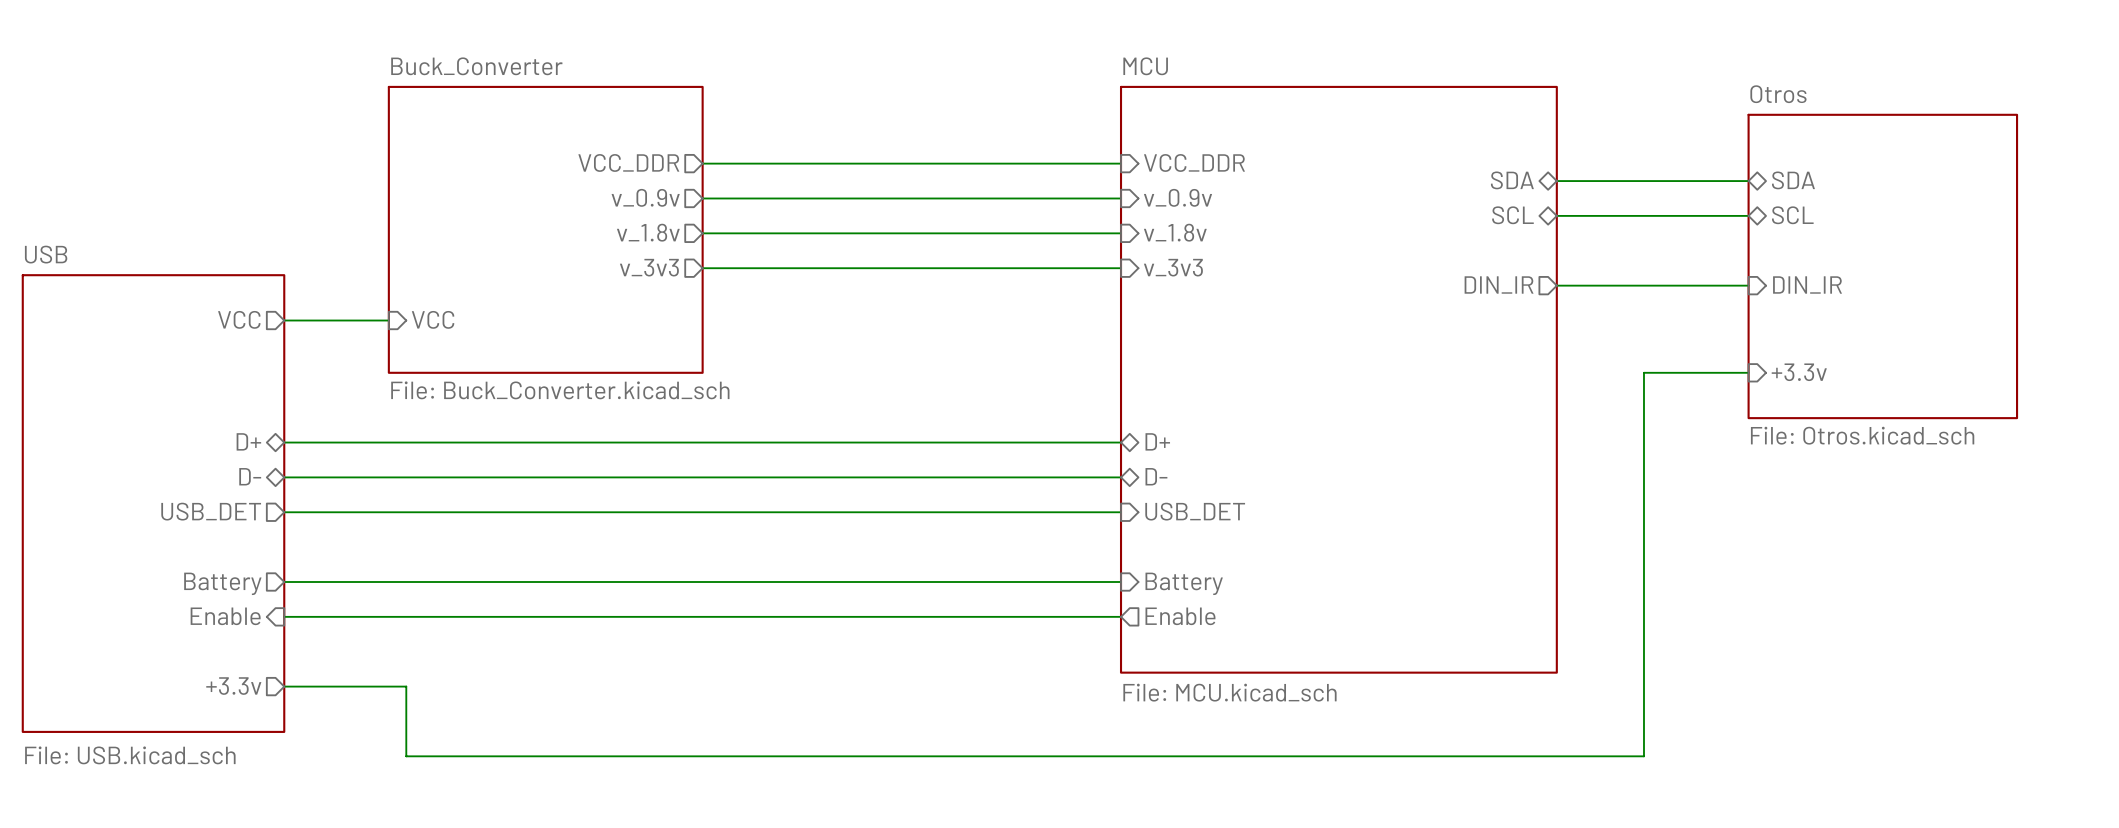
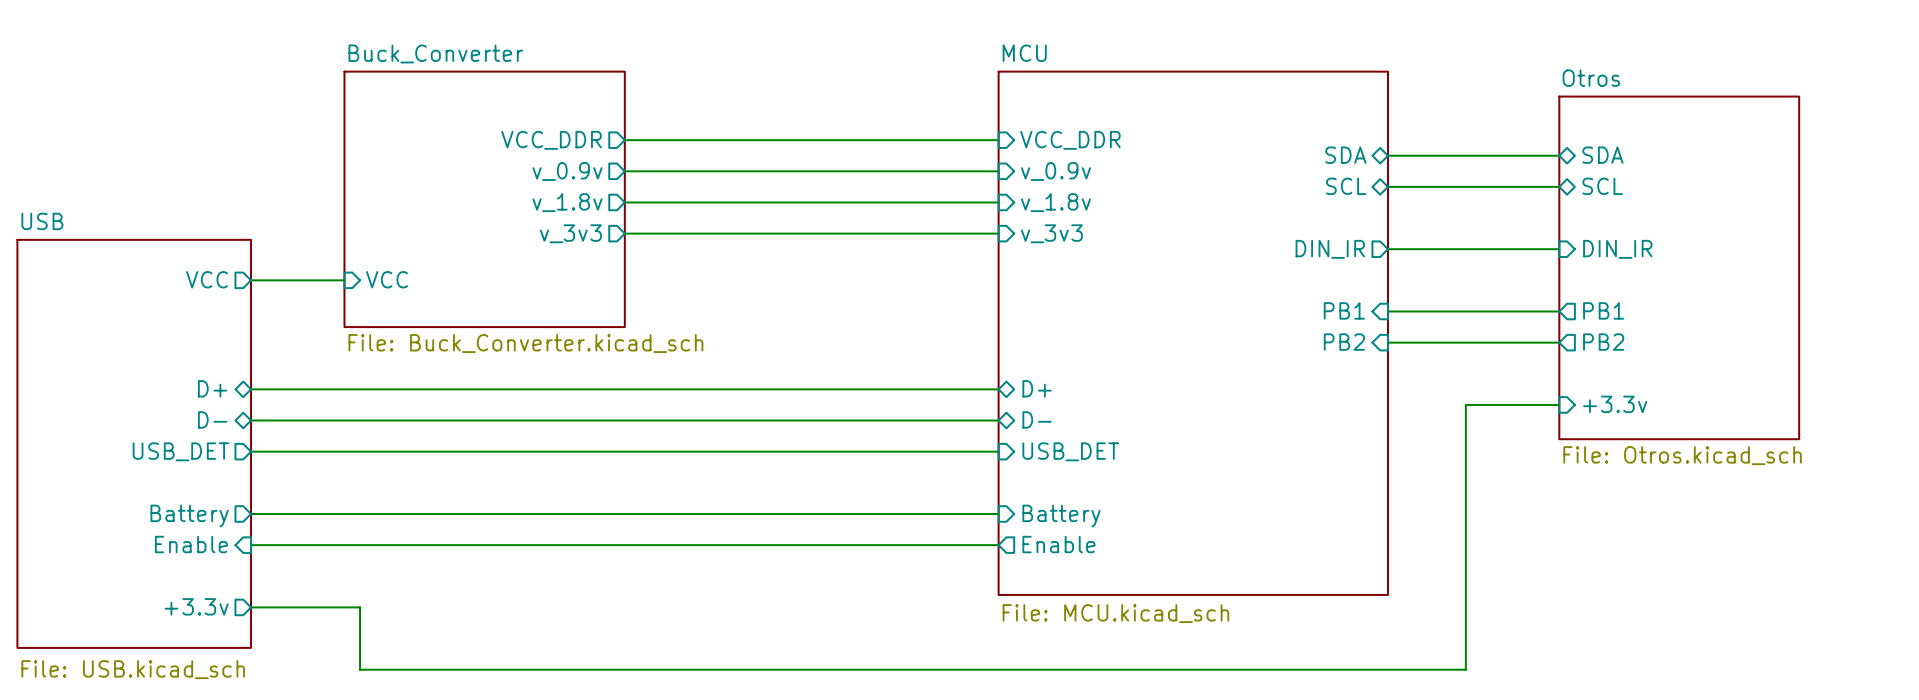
sheet Otros: File: Otros.kicad_sch (1882, 266) -> none
sheet Otros: none -> File: Otros.kicad_sch (1679, 267)
sheet pin: none -> PB1 (1344, 310)
sheet pin: none -> PB1 (1603, 310)
wire: none -> (1387, 311) (1559, 311)
wire: (1748, 372) (1643, 372) (1643, 459) -> (1559, 404) (1465, 404)
sheet pin position: +3.3v (1799, 372) -> +3.3v (1615, 404)
sheet pin: none -> PB2 (1344, 342)
sheet pin: none -> PB2 (1603, 342)
wire: none -> (1387, 342) (1559, 342)

